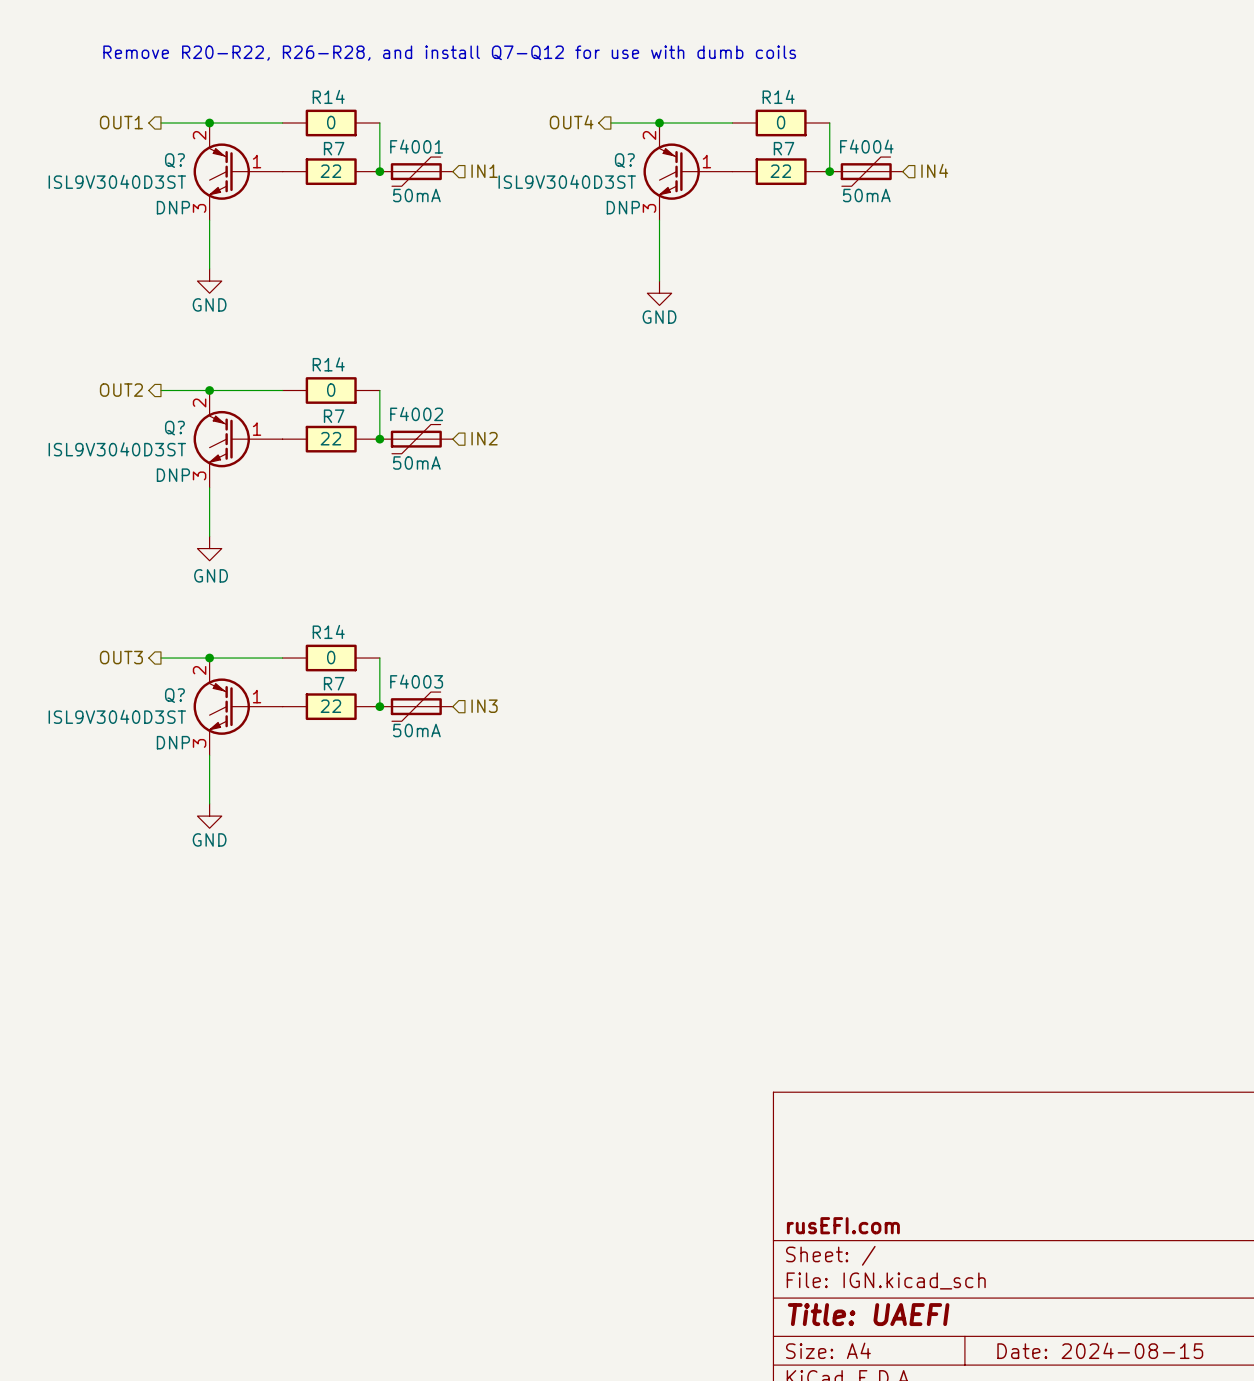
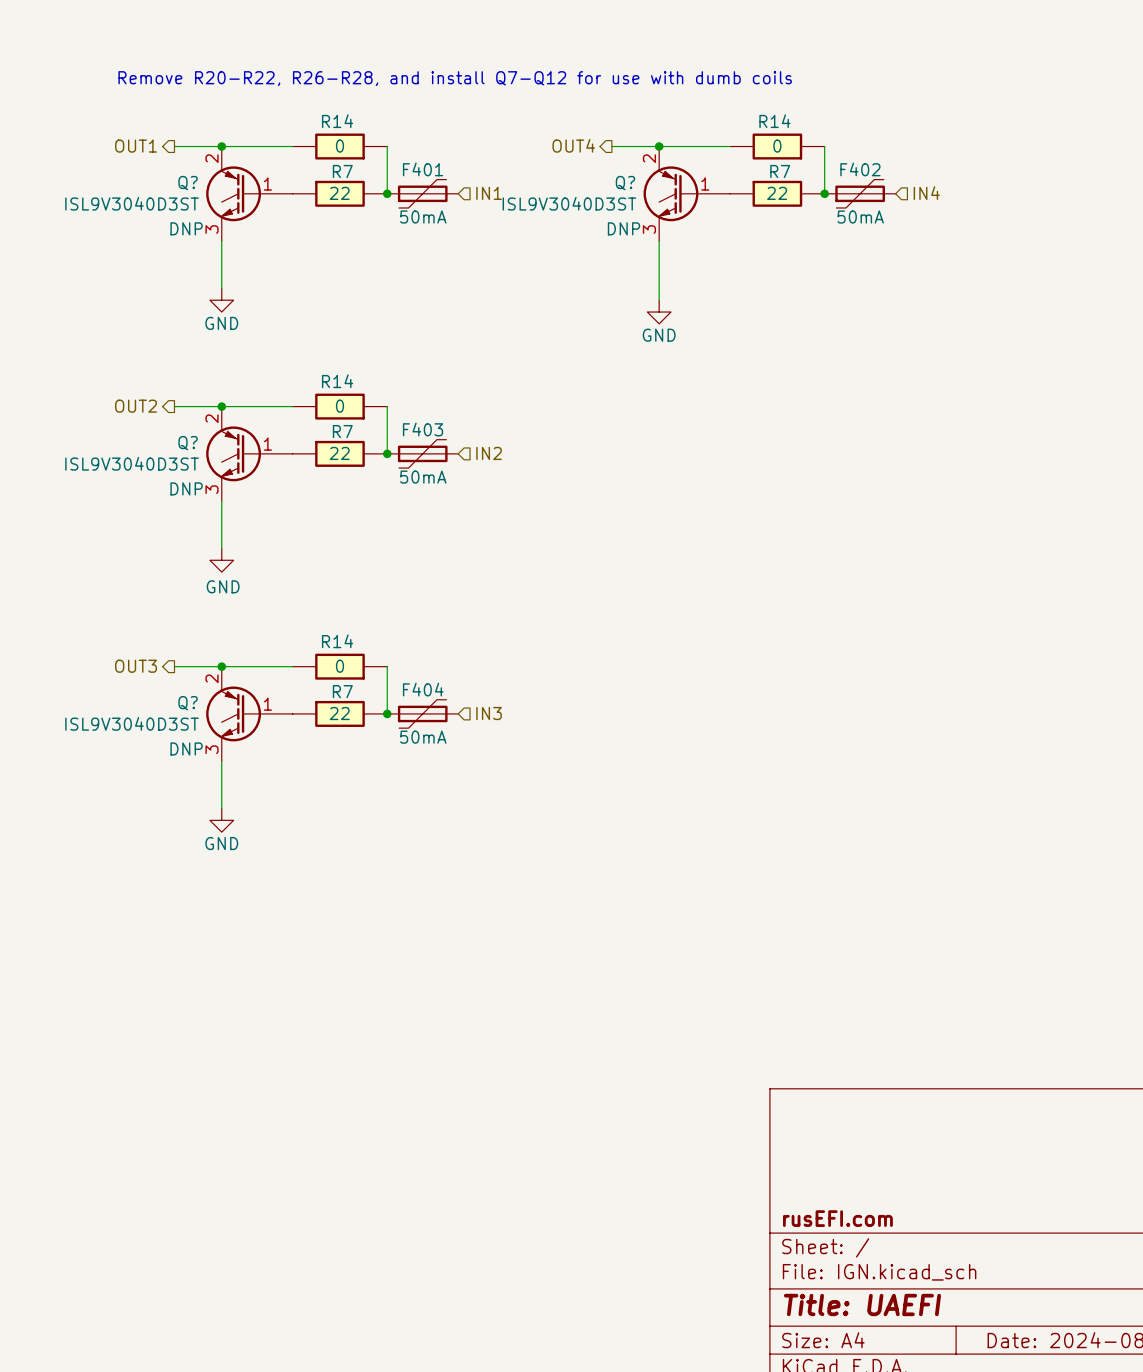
F4001 name: F4001 (416, 146) -> F401 (423, 169)
F4004 name: F4004 (866, 146) -> F402 (860, 169)
F4002 name: F4002 (416, 414) -> F403 (423, 429)
F4003 name: F4003 (416, 681) -> F404 (423, 689)

